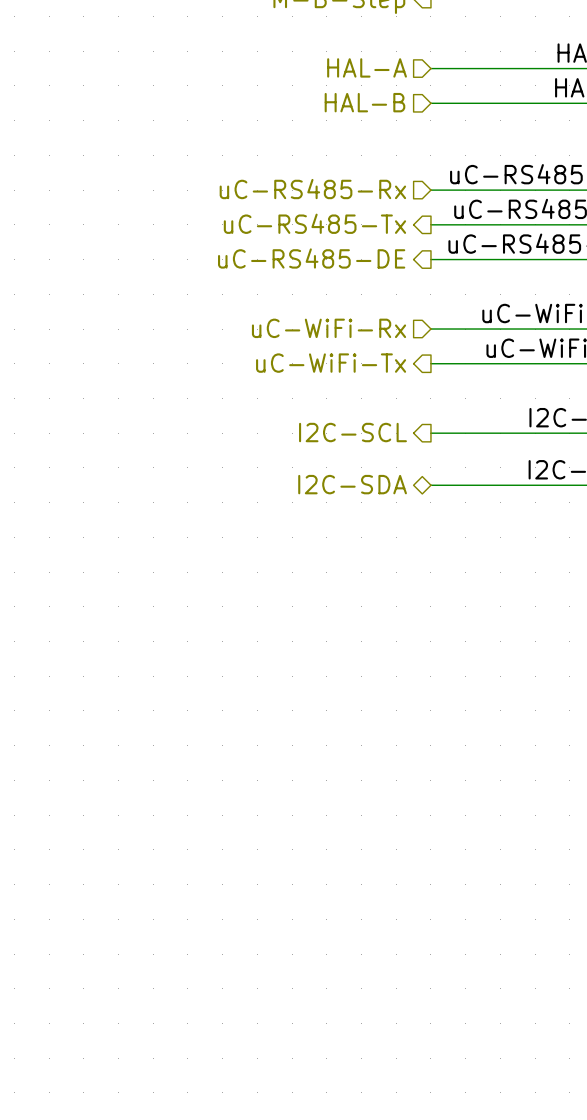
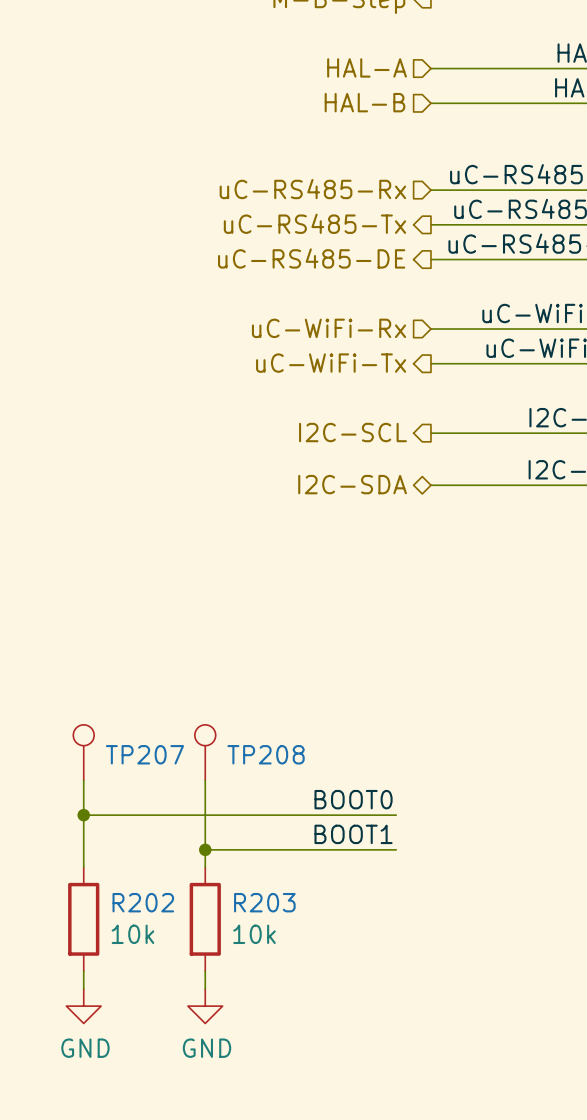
TP207: none -> (83, 752)
TP208: none -> (205, 752)
wire: none -> (83, 780) (83, 867)
wire: none -> (205, 780) (205, 867)
label: none -> BOOT0 (353, 799)
wire: none -> (83, 815) (396, 815)
junction: none -> (83, 815)
label: none -> BOOT1 (353, 834)
wire: none -> (205, 849) (396, 849)
junction: none -> (205, 849)
R202: none -> 10k (83, 919)
R203: none -> 10k (205, 919)
wire: none -> (83, 971) (83, 988)
wire: none -> (205, 971) (205, 988)
power symbol: none -> GND (83, 1006)
power symbol: none -> GND (205, 1006)

